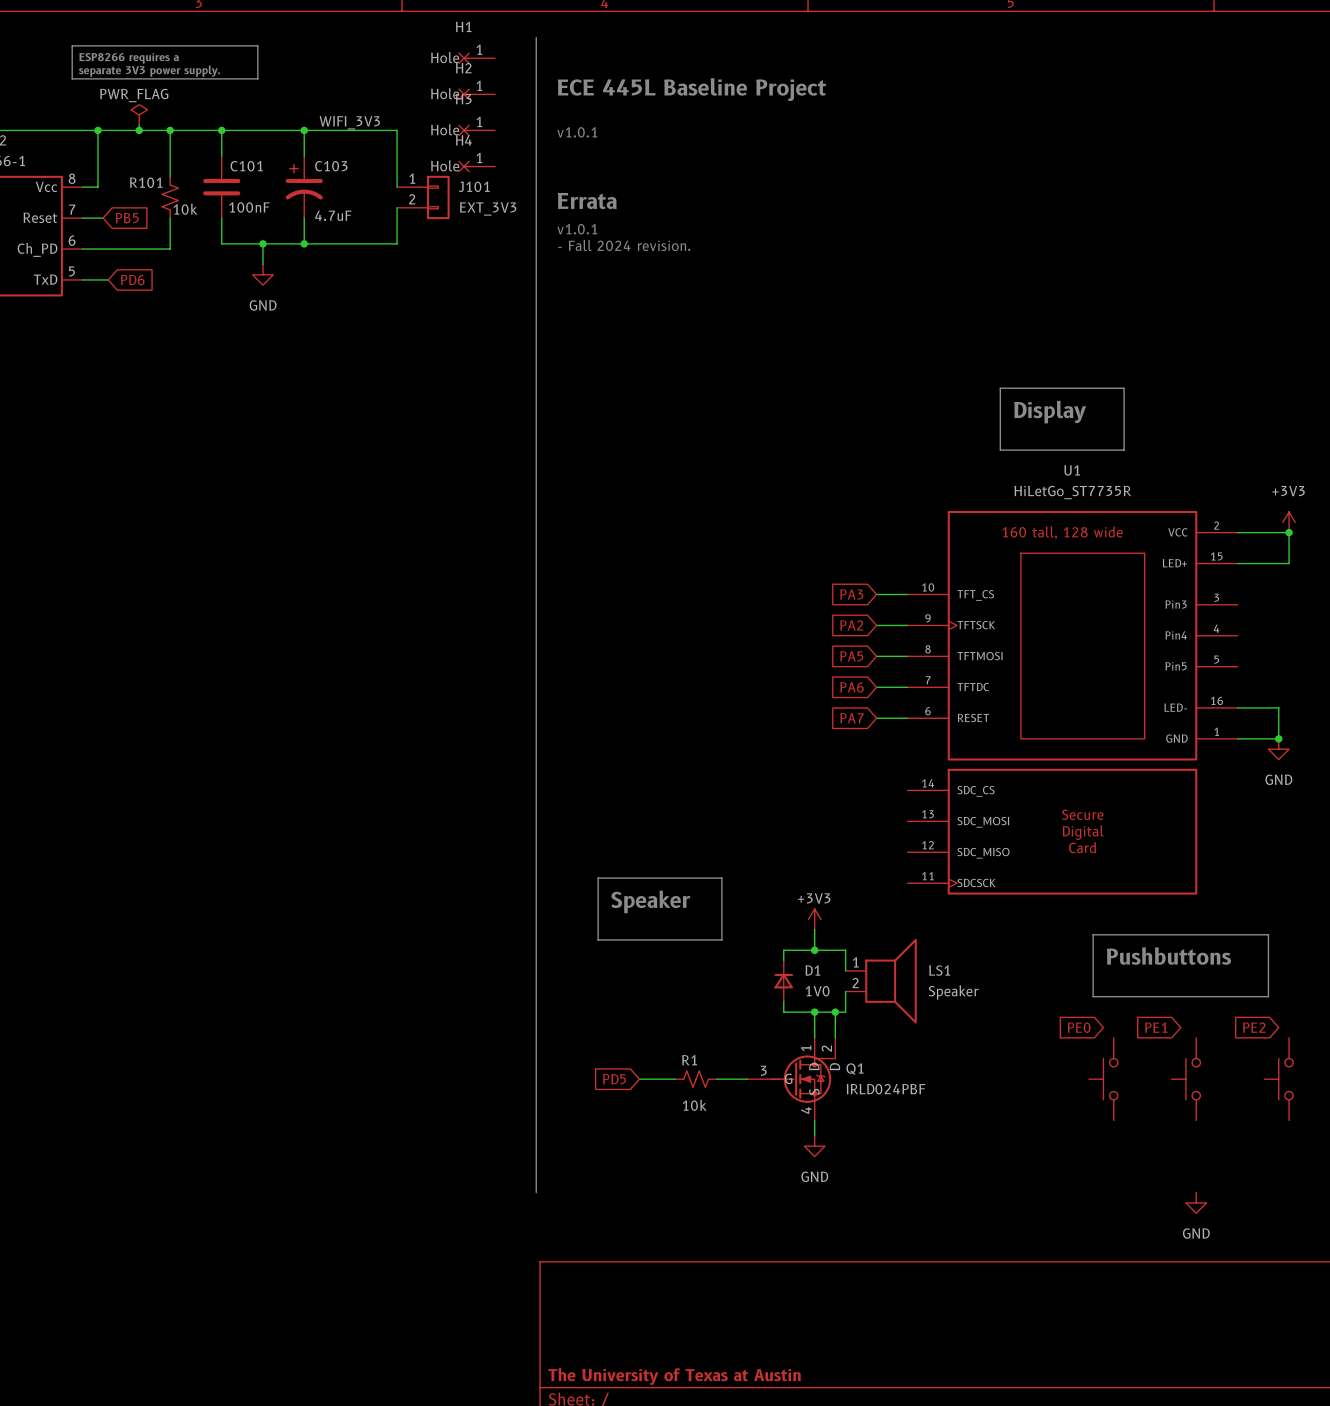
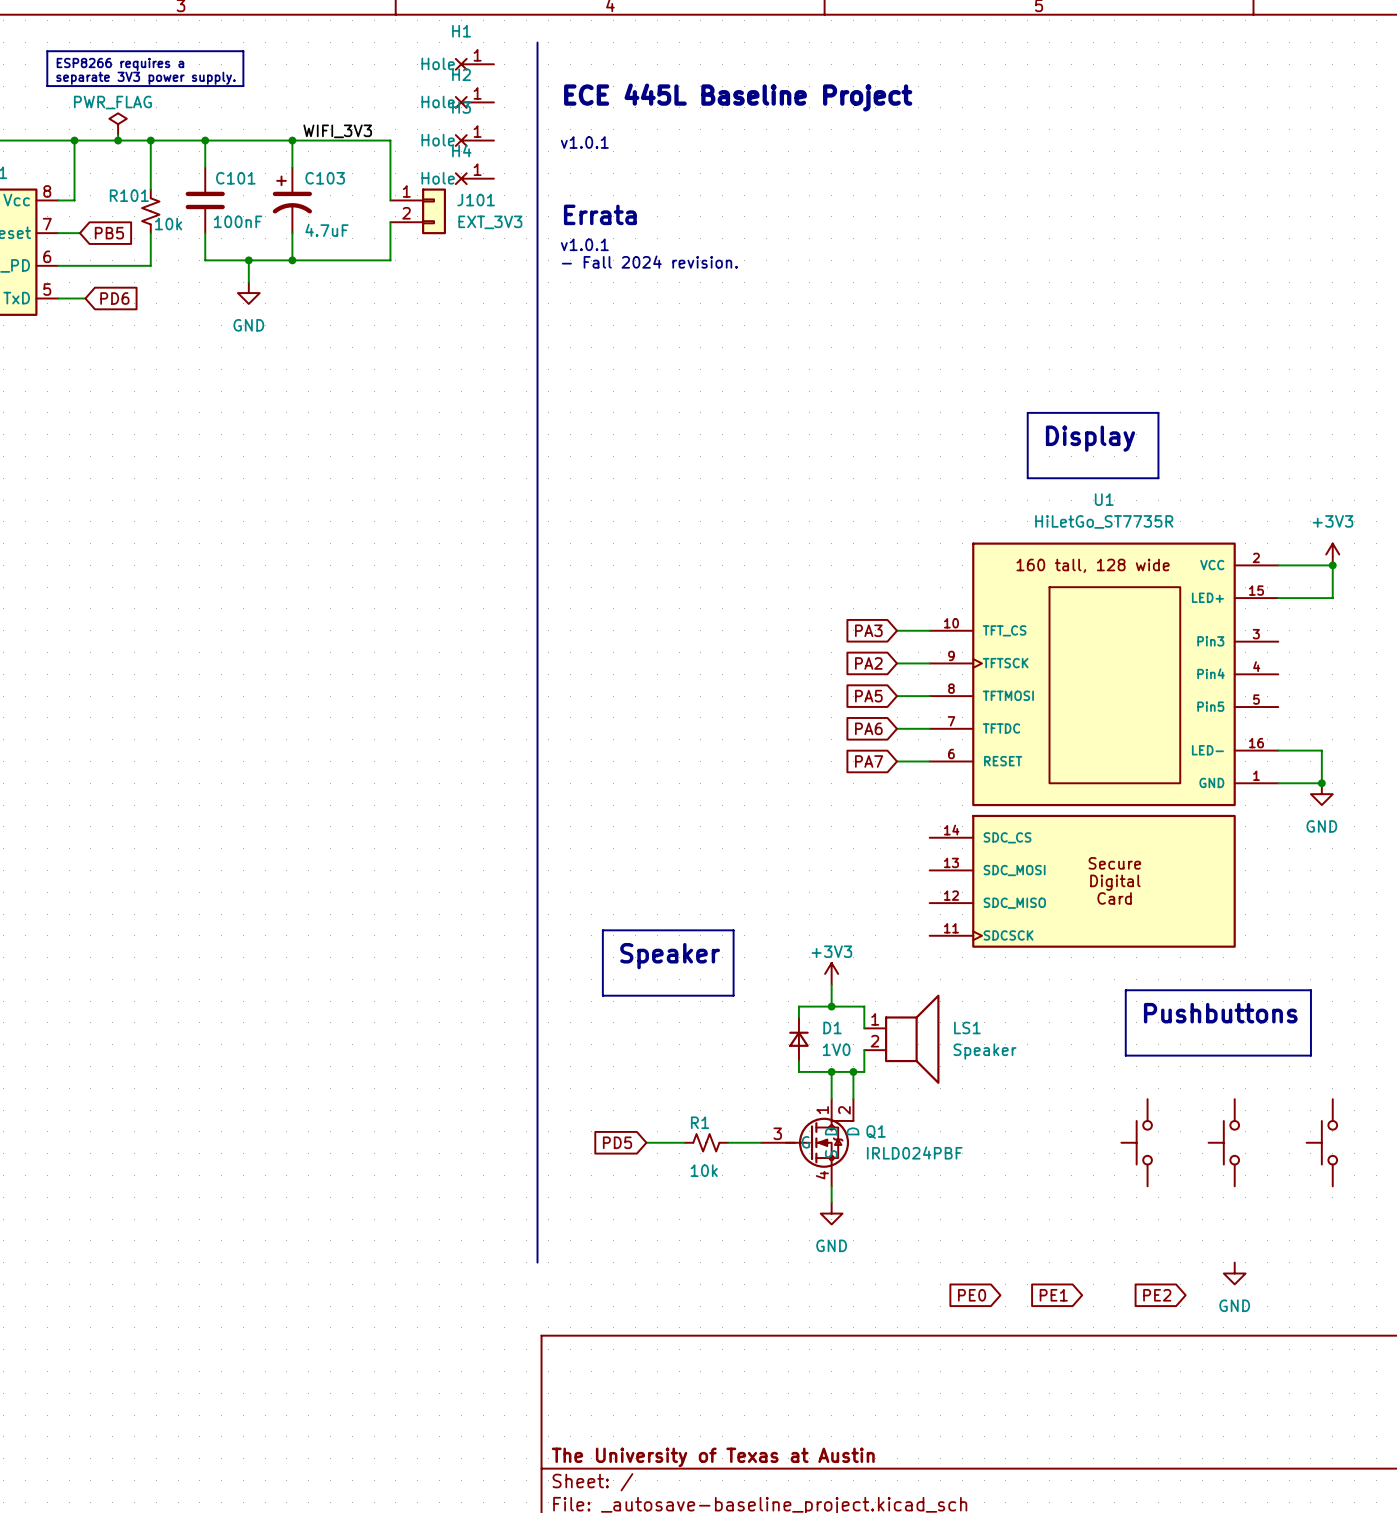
global label: PE0 (1079, 1027) -> none
global label: PE1 (1156, 1027) -> none
global label: PE2 (1254, 1027) -> none
global label: none -> PE0 (972, 1295)
global label: none -> PE1 (1053, 1295)
global label: none -> PE2 (1157, 1295)

